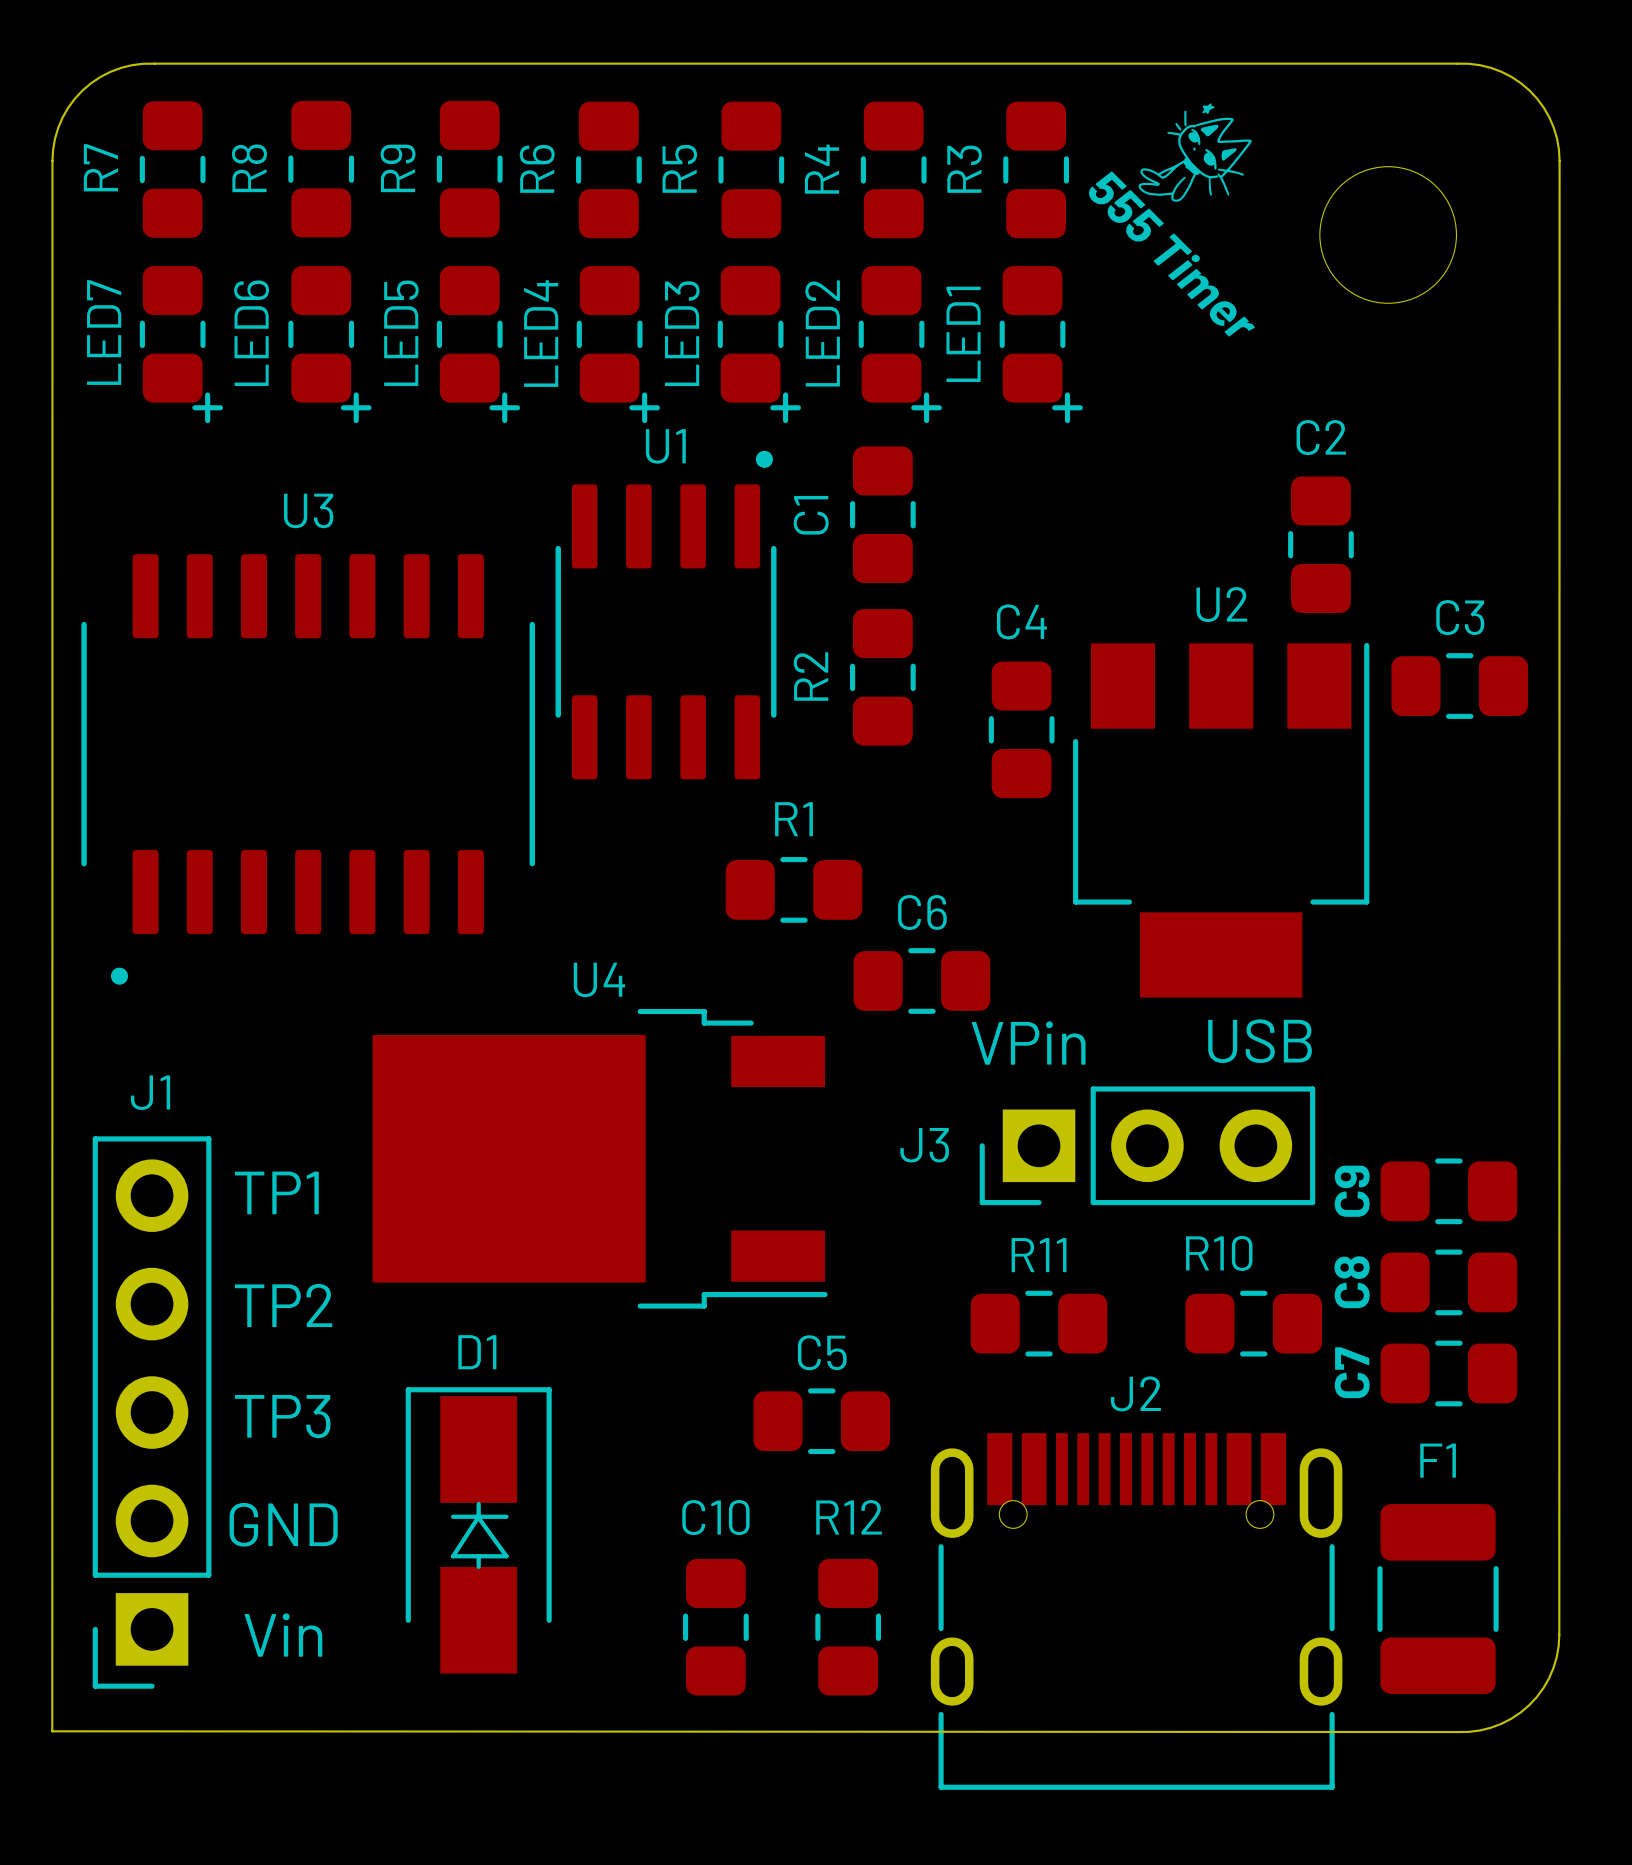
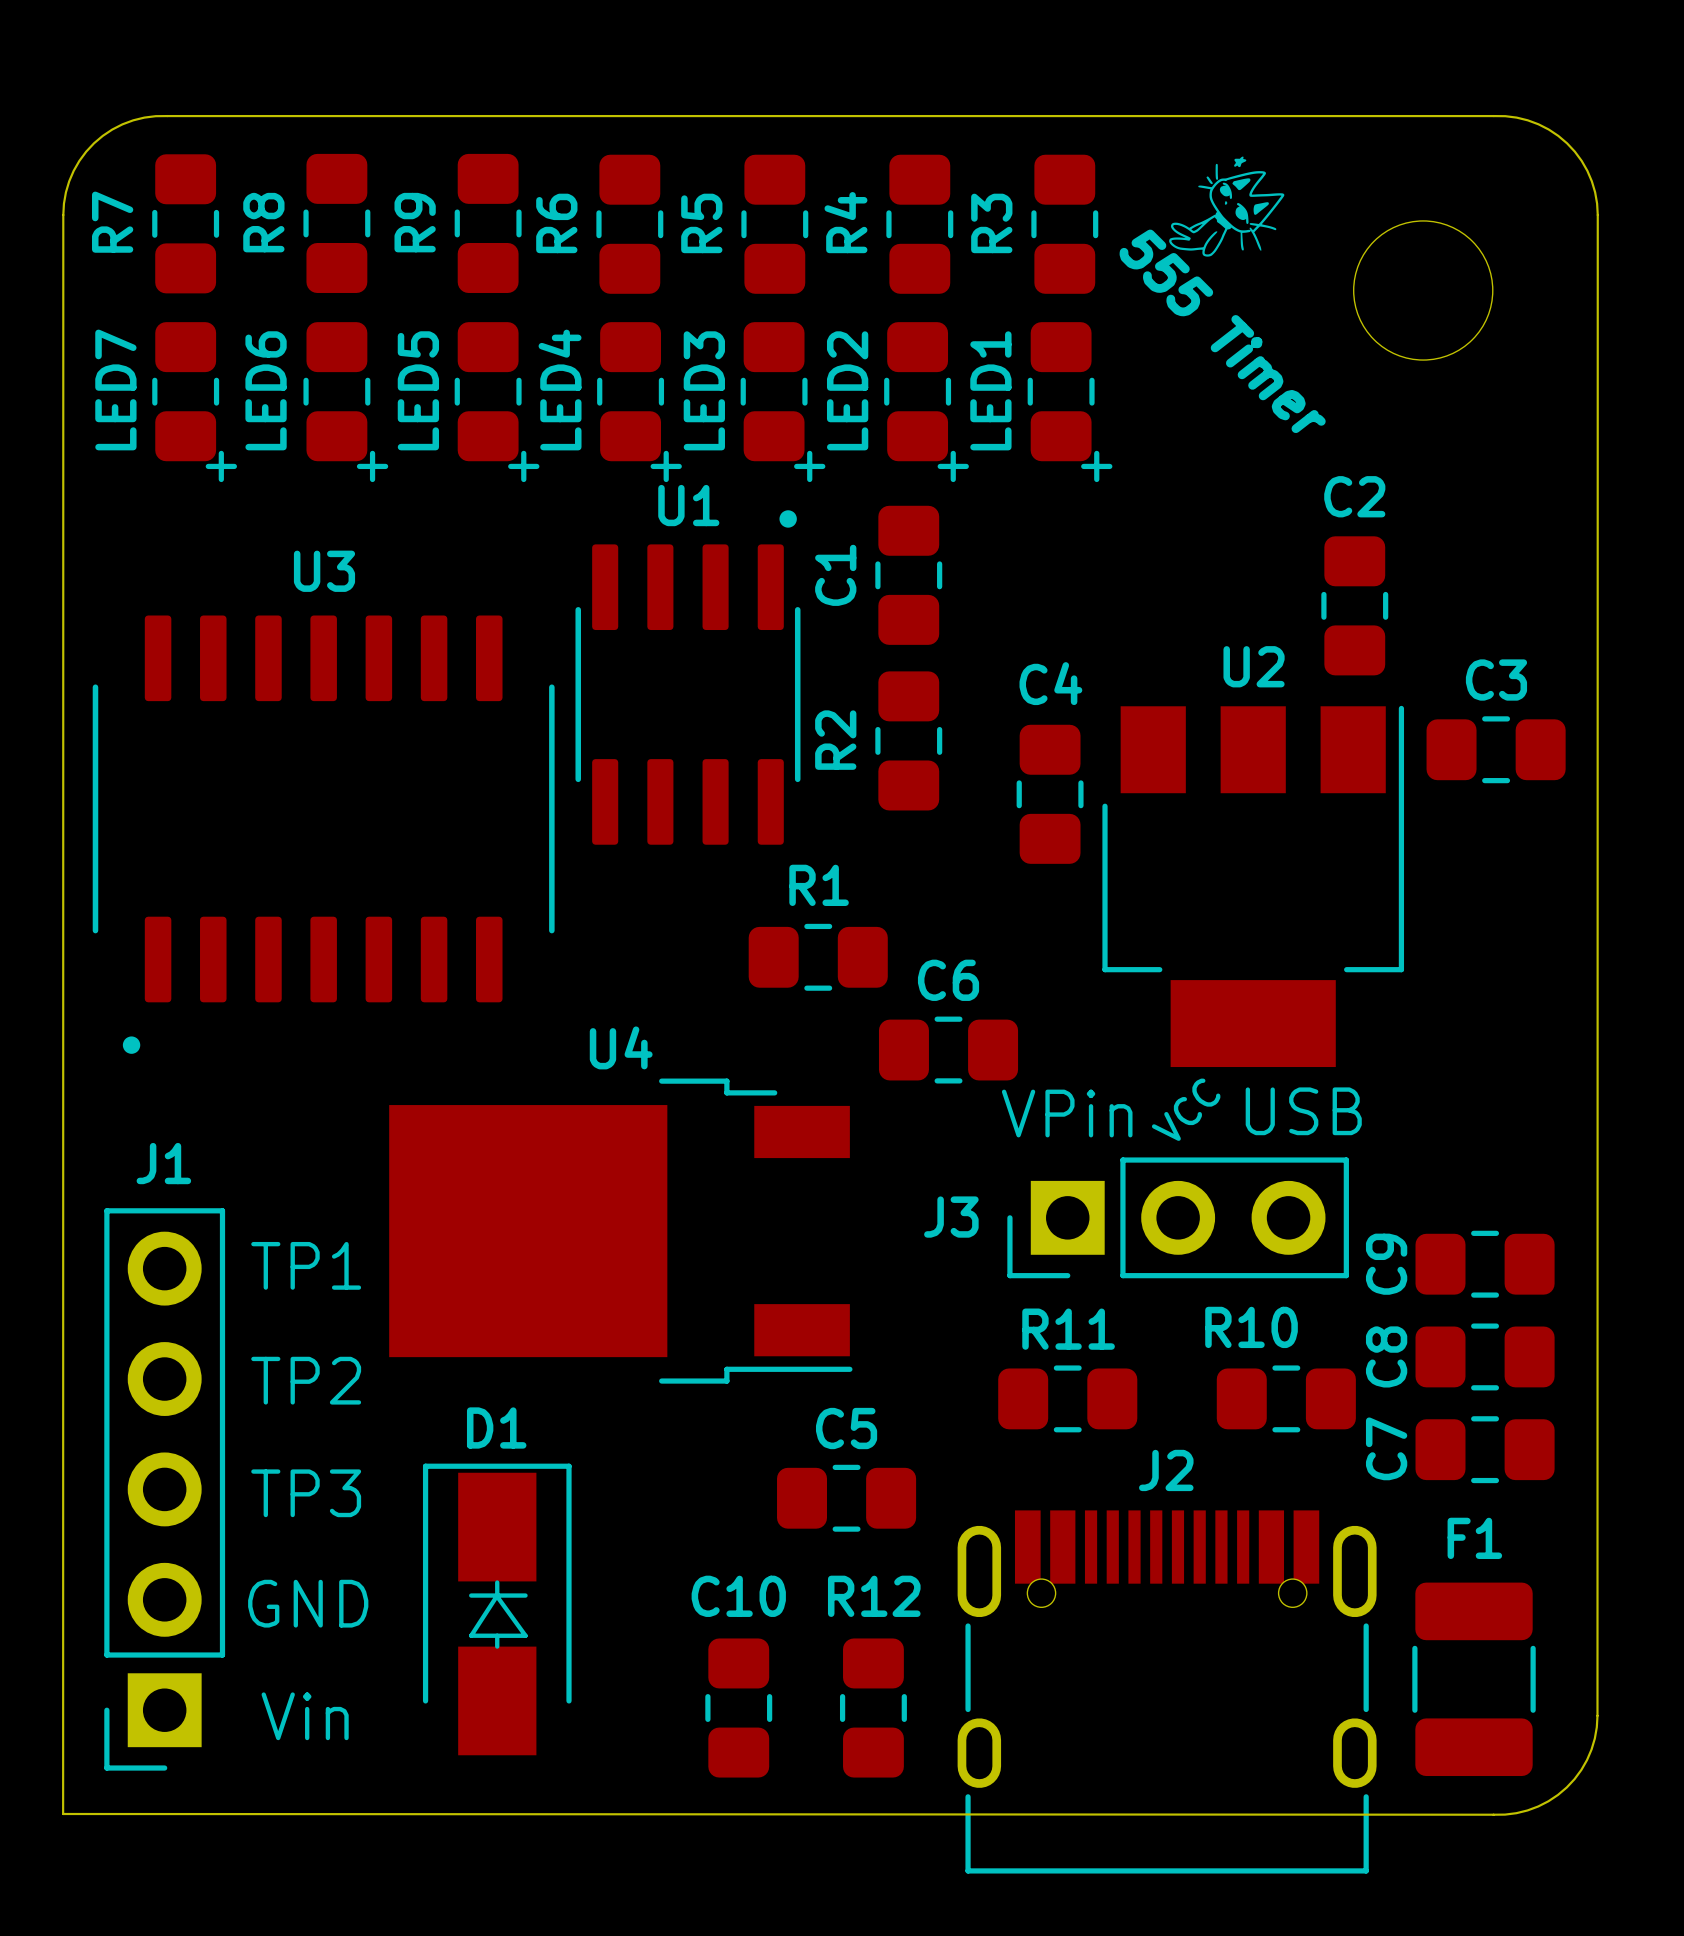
text: none -> VCC (1186, 1109)

